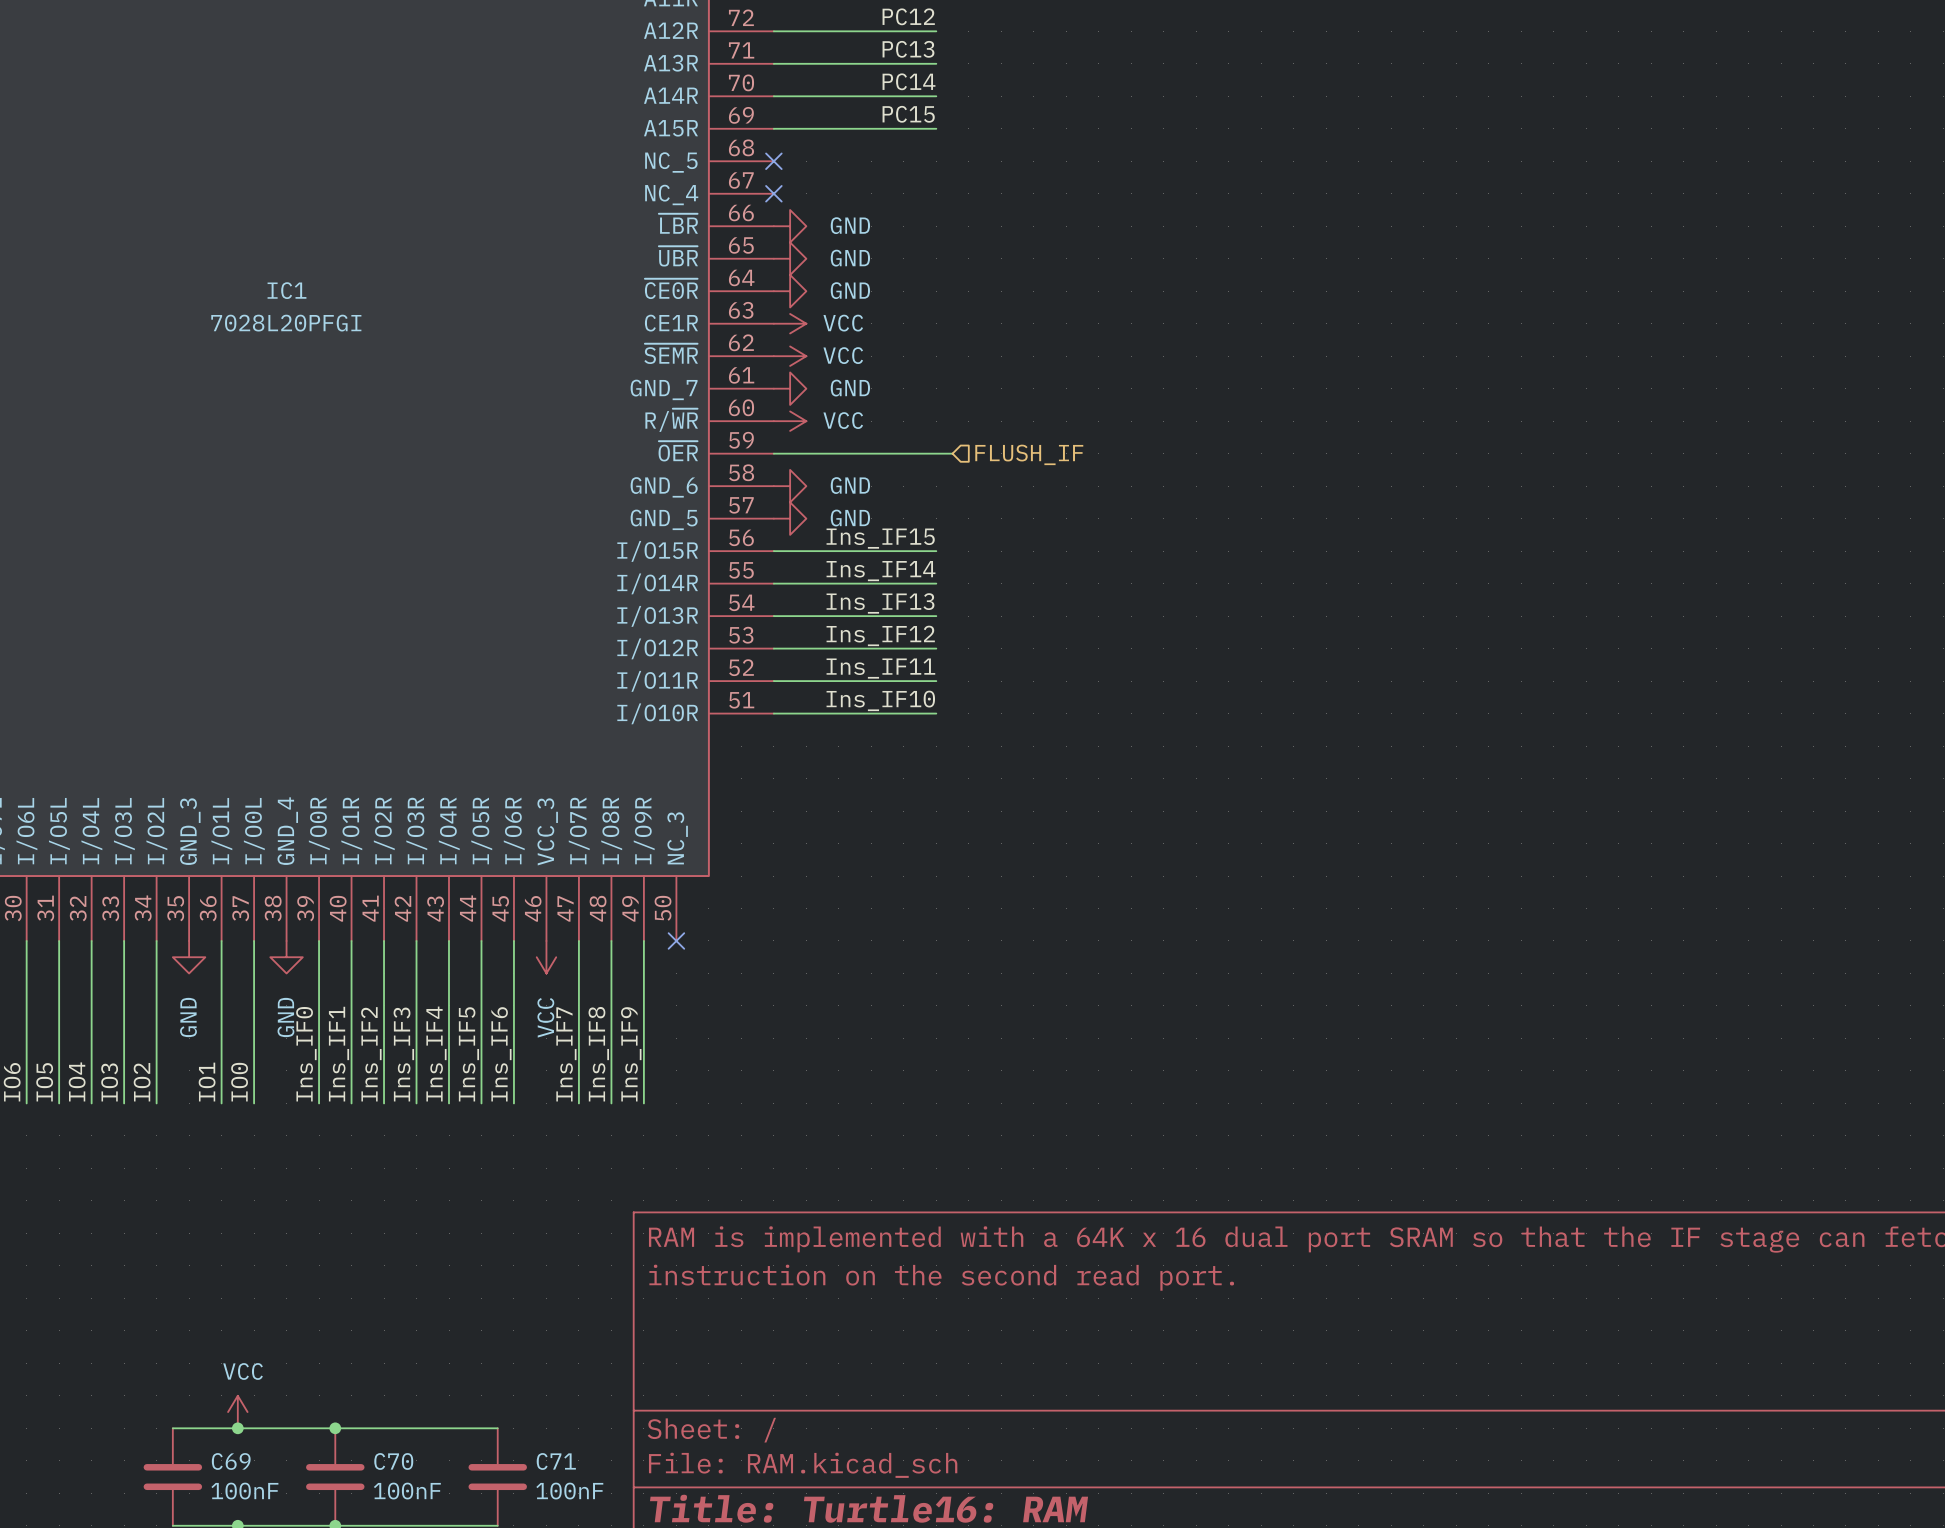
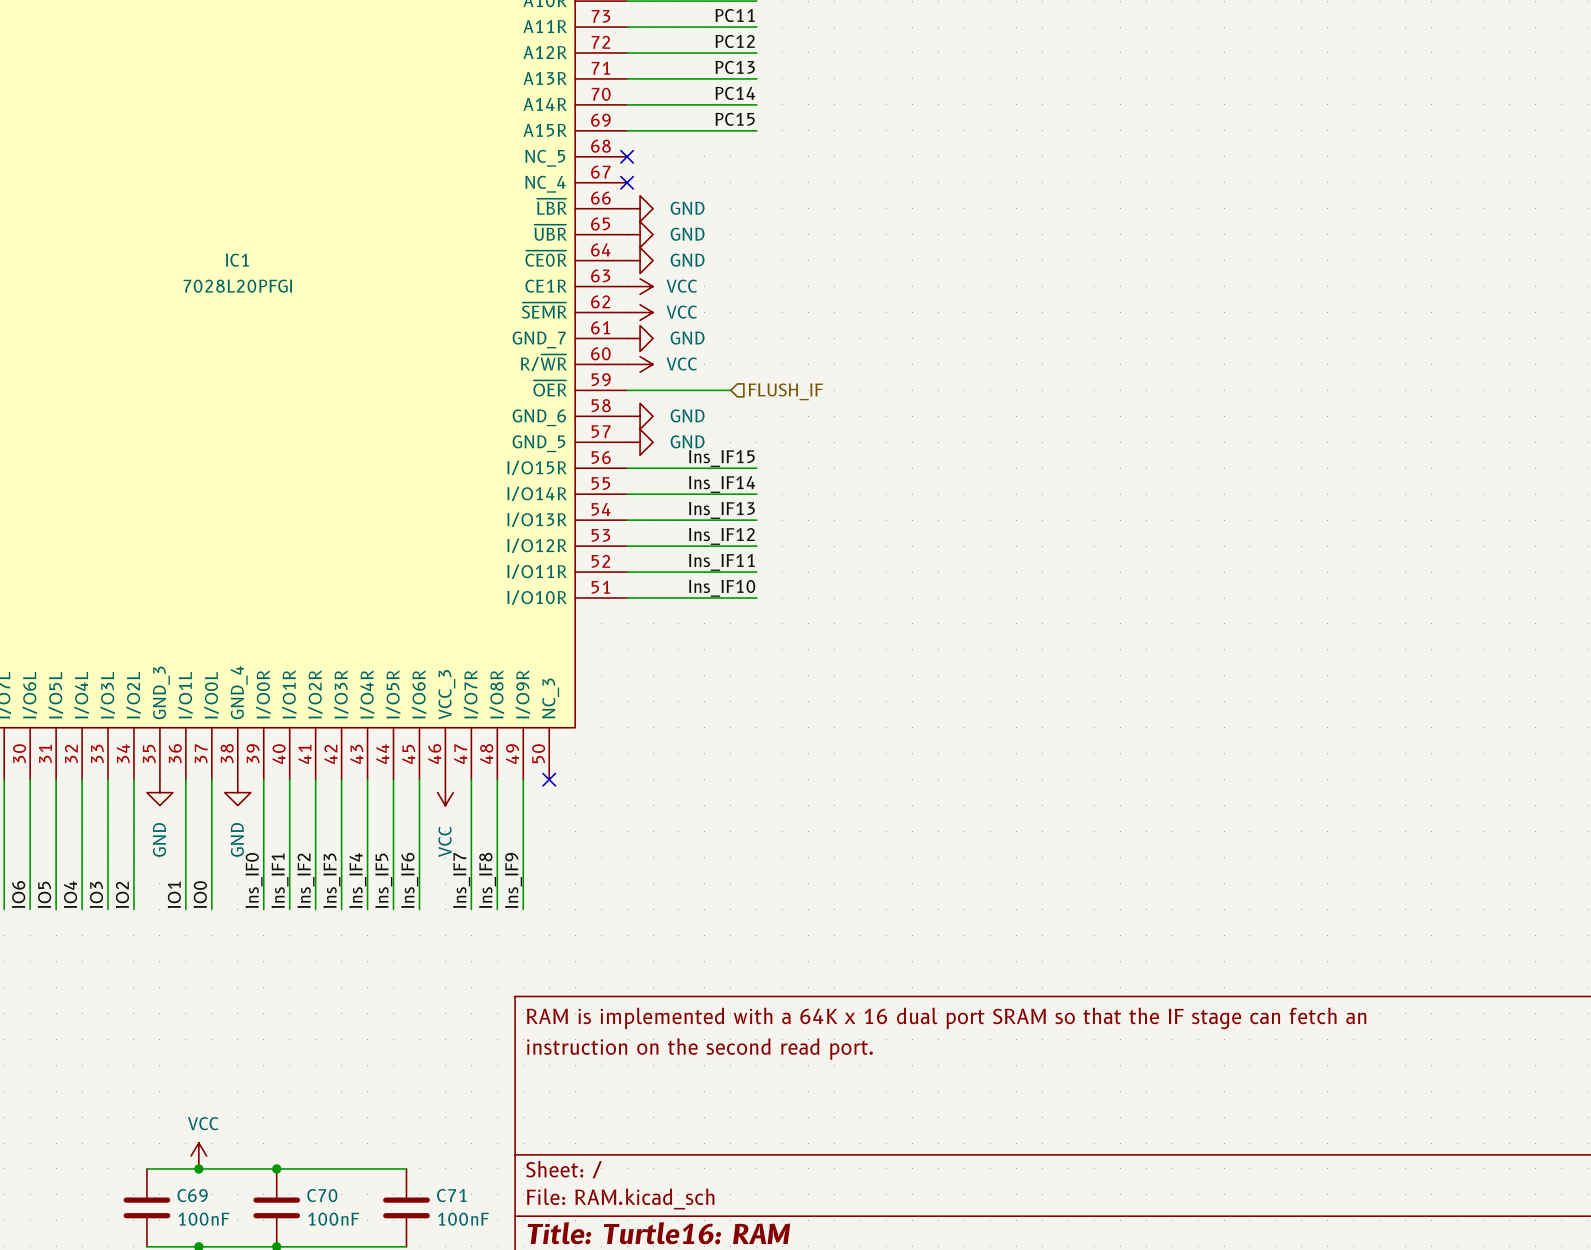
wire: (903, 453) (952, 453) -> none
hierarchical label position: FLUSH_IF (1029, 454) -> FLUSH_IF (785, 391)

